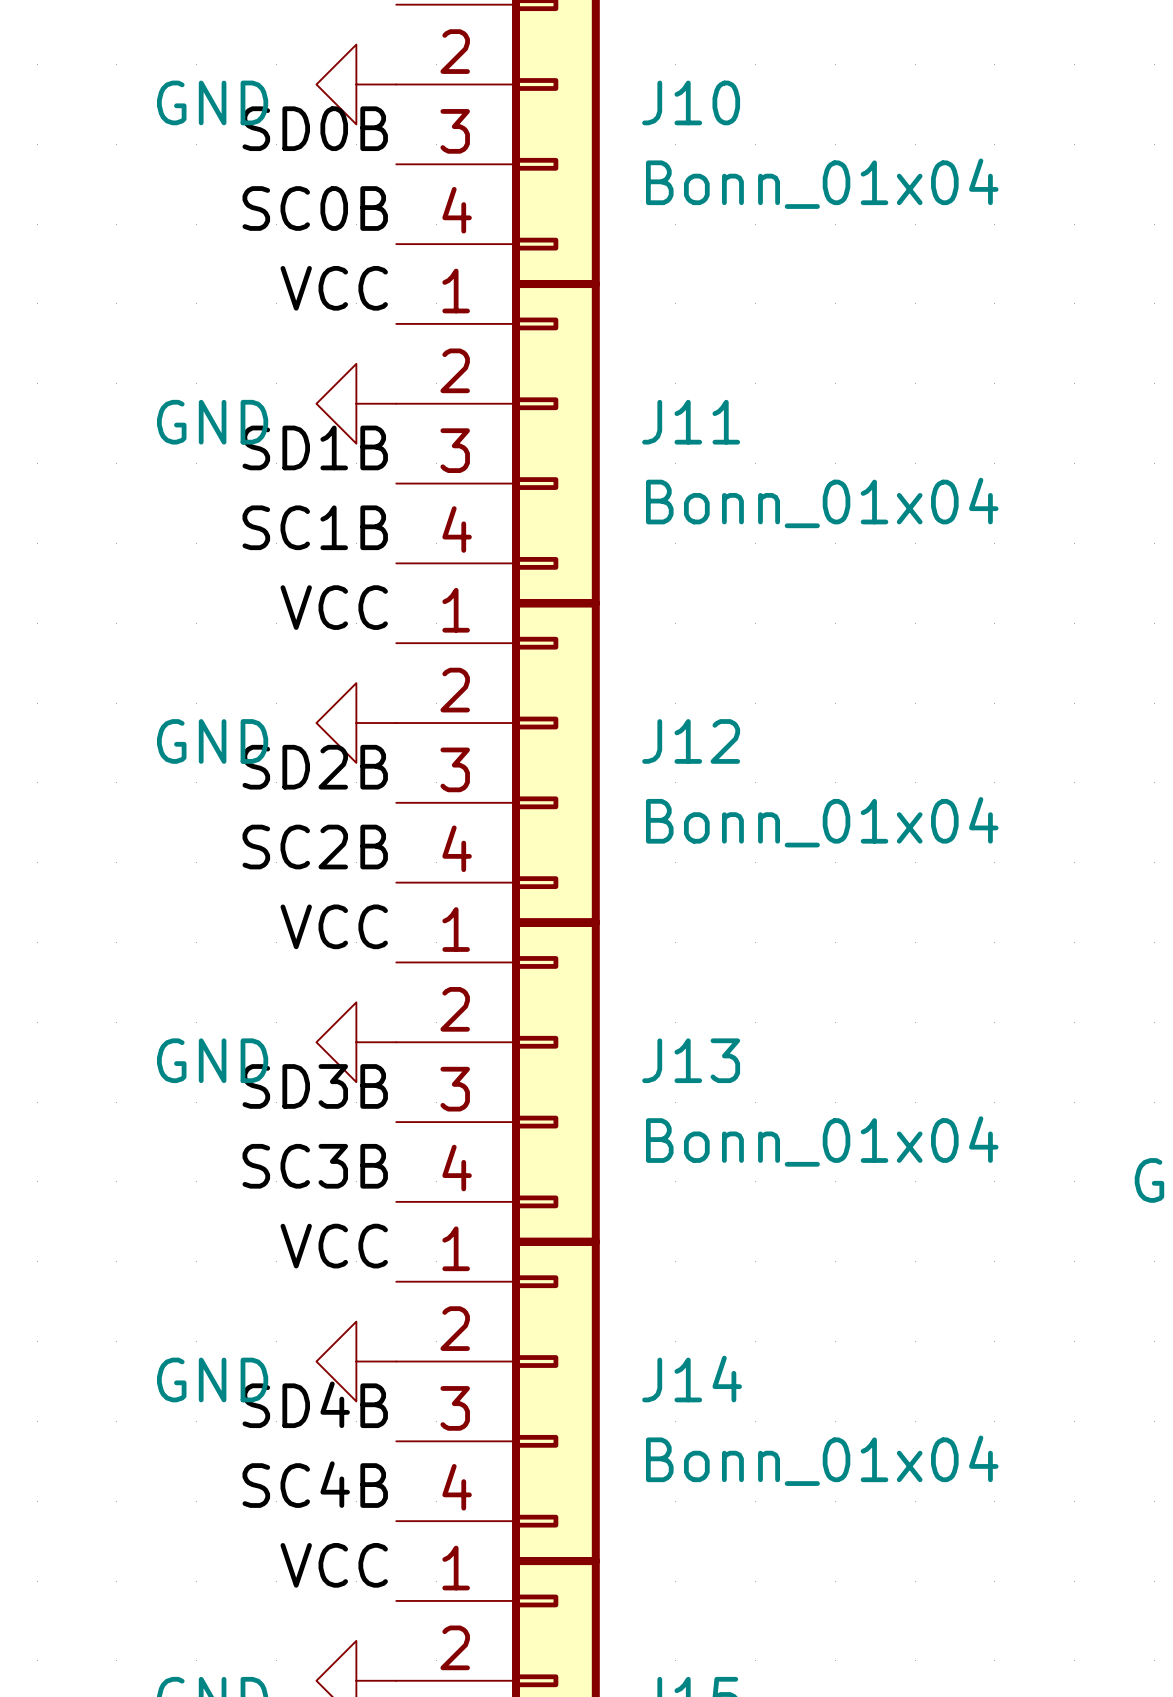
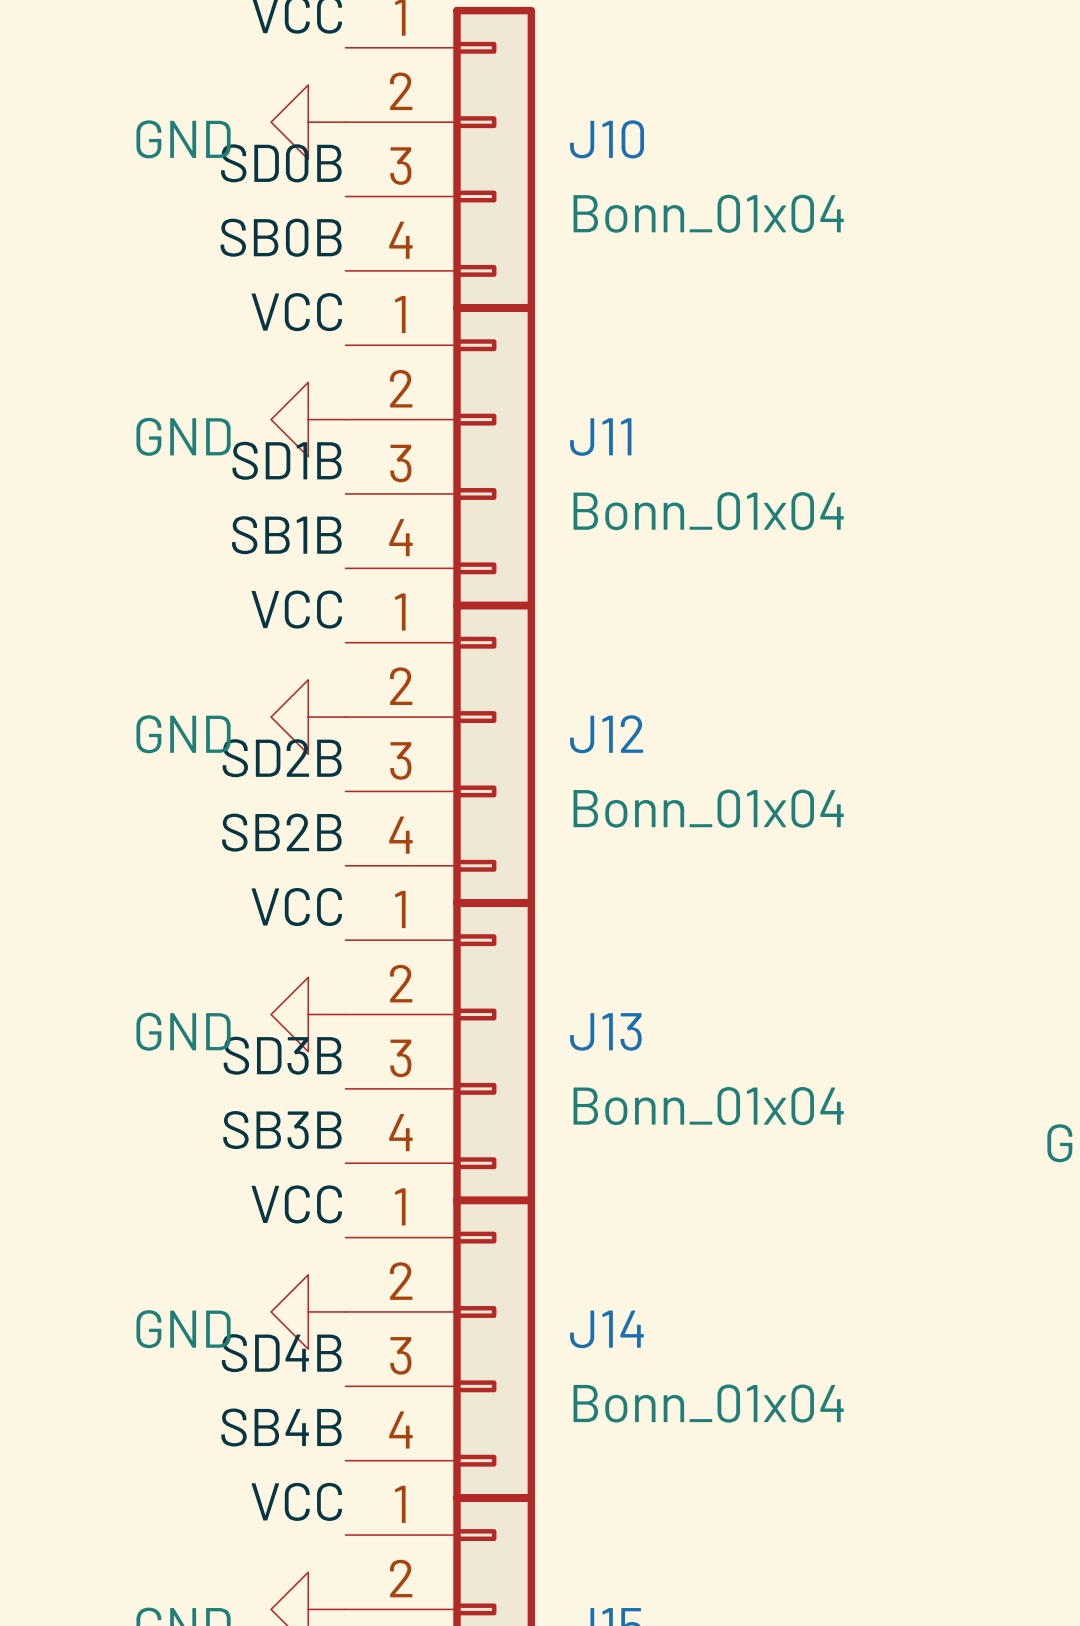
label: SC0B (315, 208) -> SB0B (281, 237)
label: SC1B (315, 527) -> SB1B (286, 535)
label: SC2B (315, 847) -> SB2B (281, 832)
label: SC3B (315, 1166) -> SB3B (282, 1130)
label: SC4B (315, 1484) -> SB4B (281, 1427)

